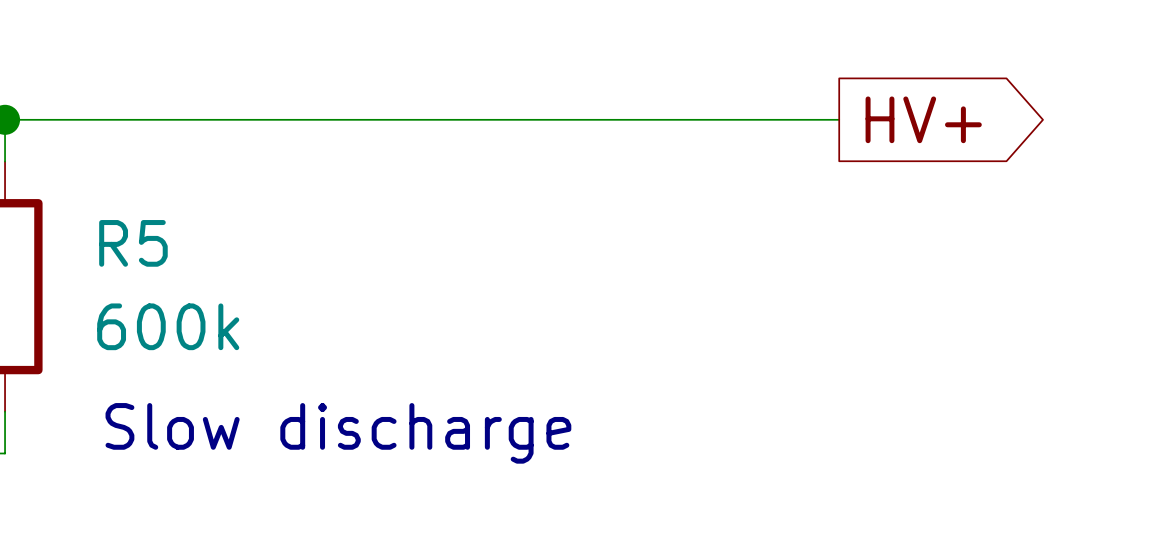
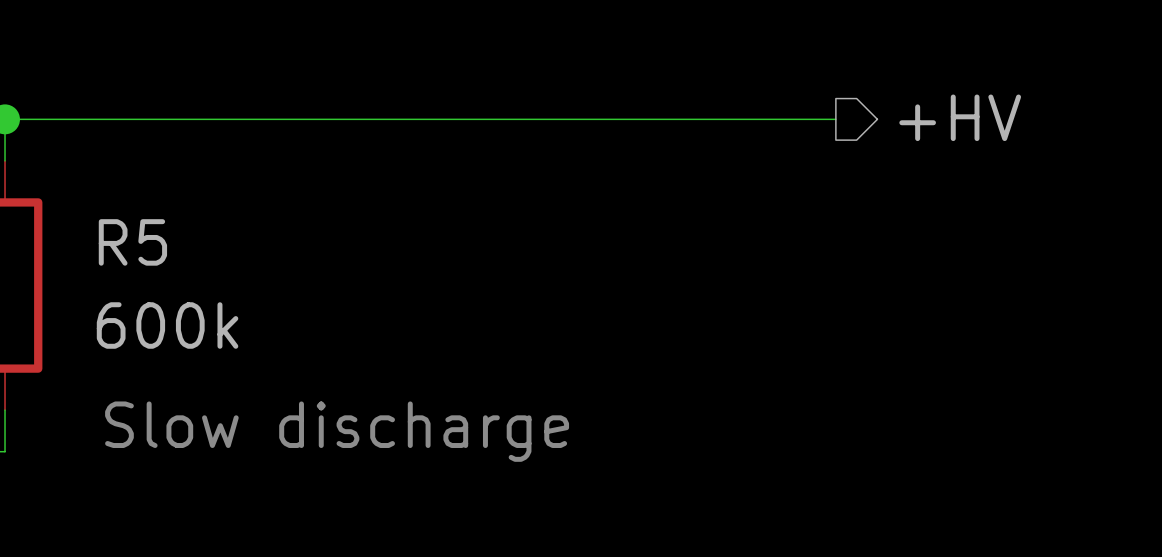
hierarchical label: none -> +HV (960, 117)
global label: HV+ (923, 119) -> none

